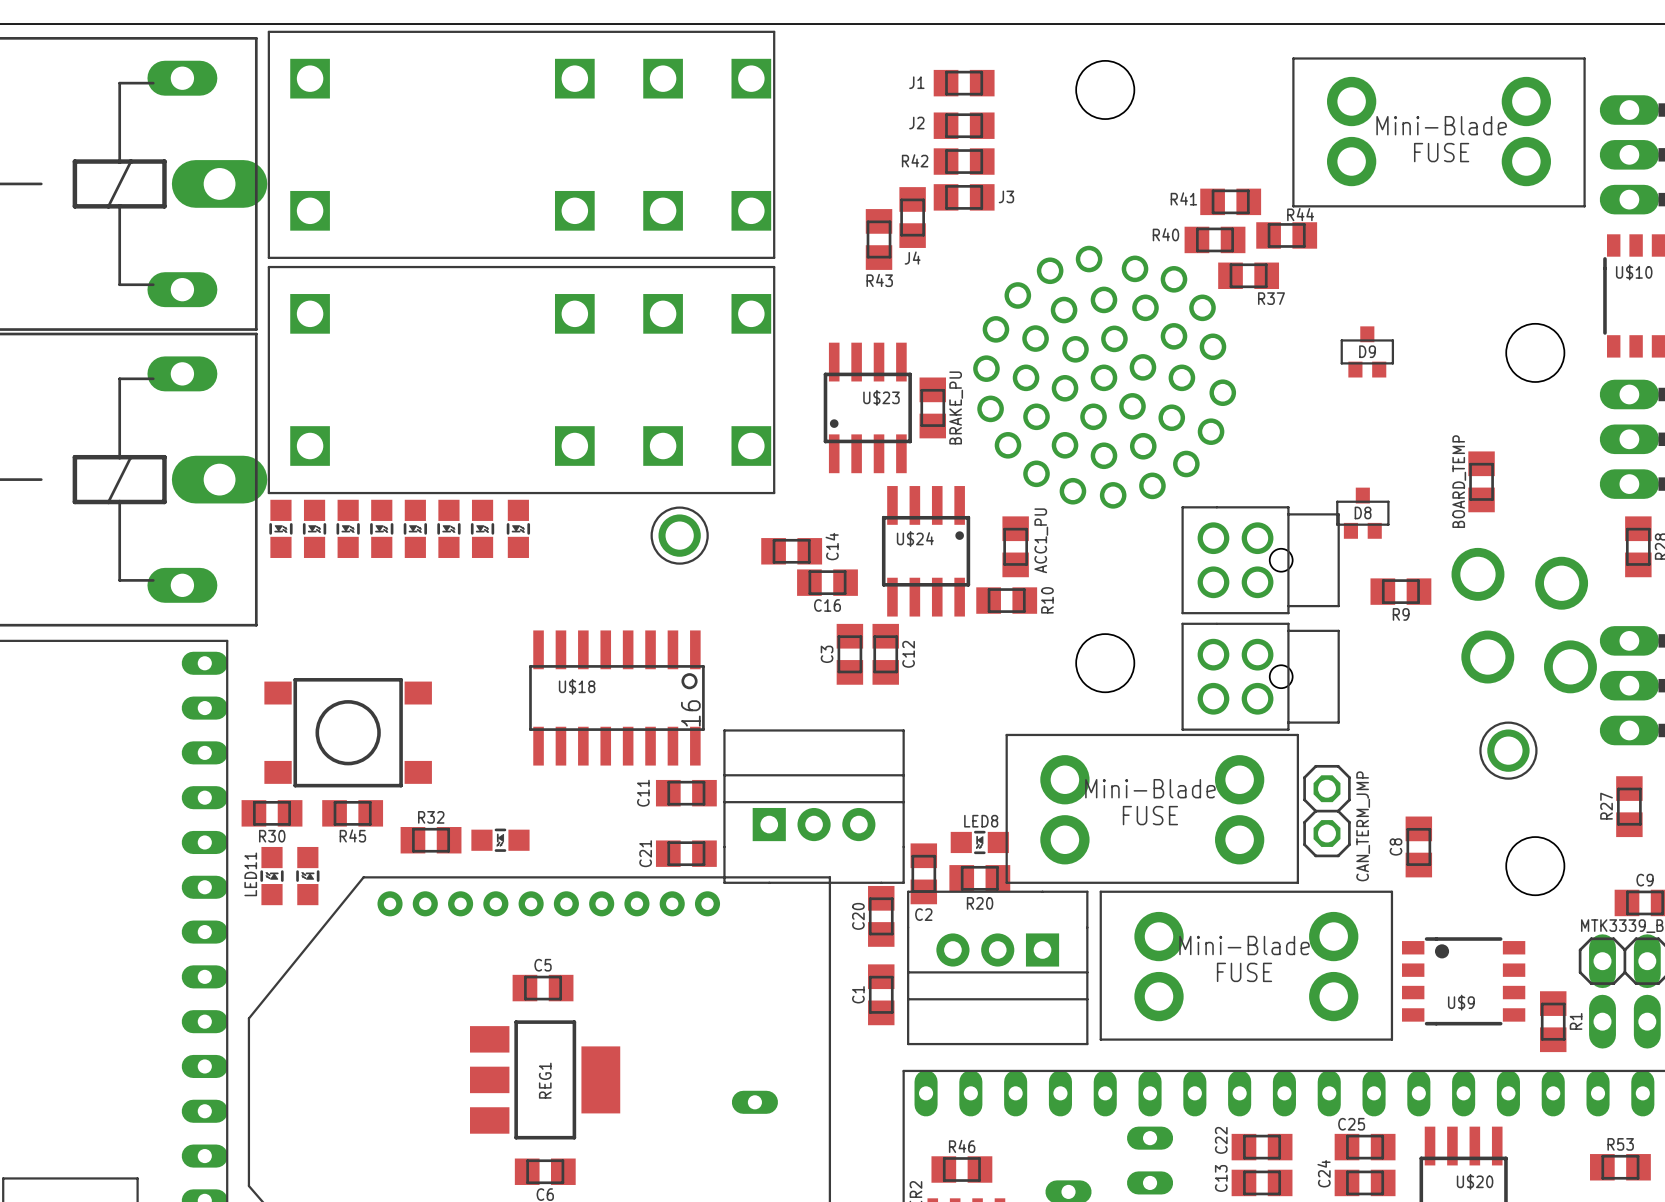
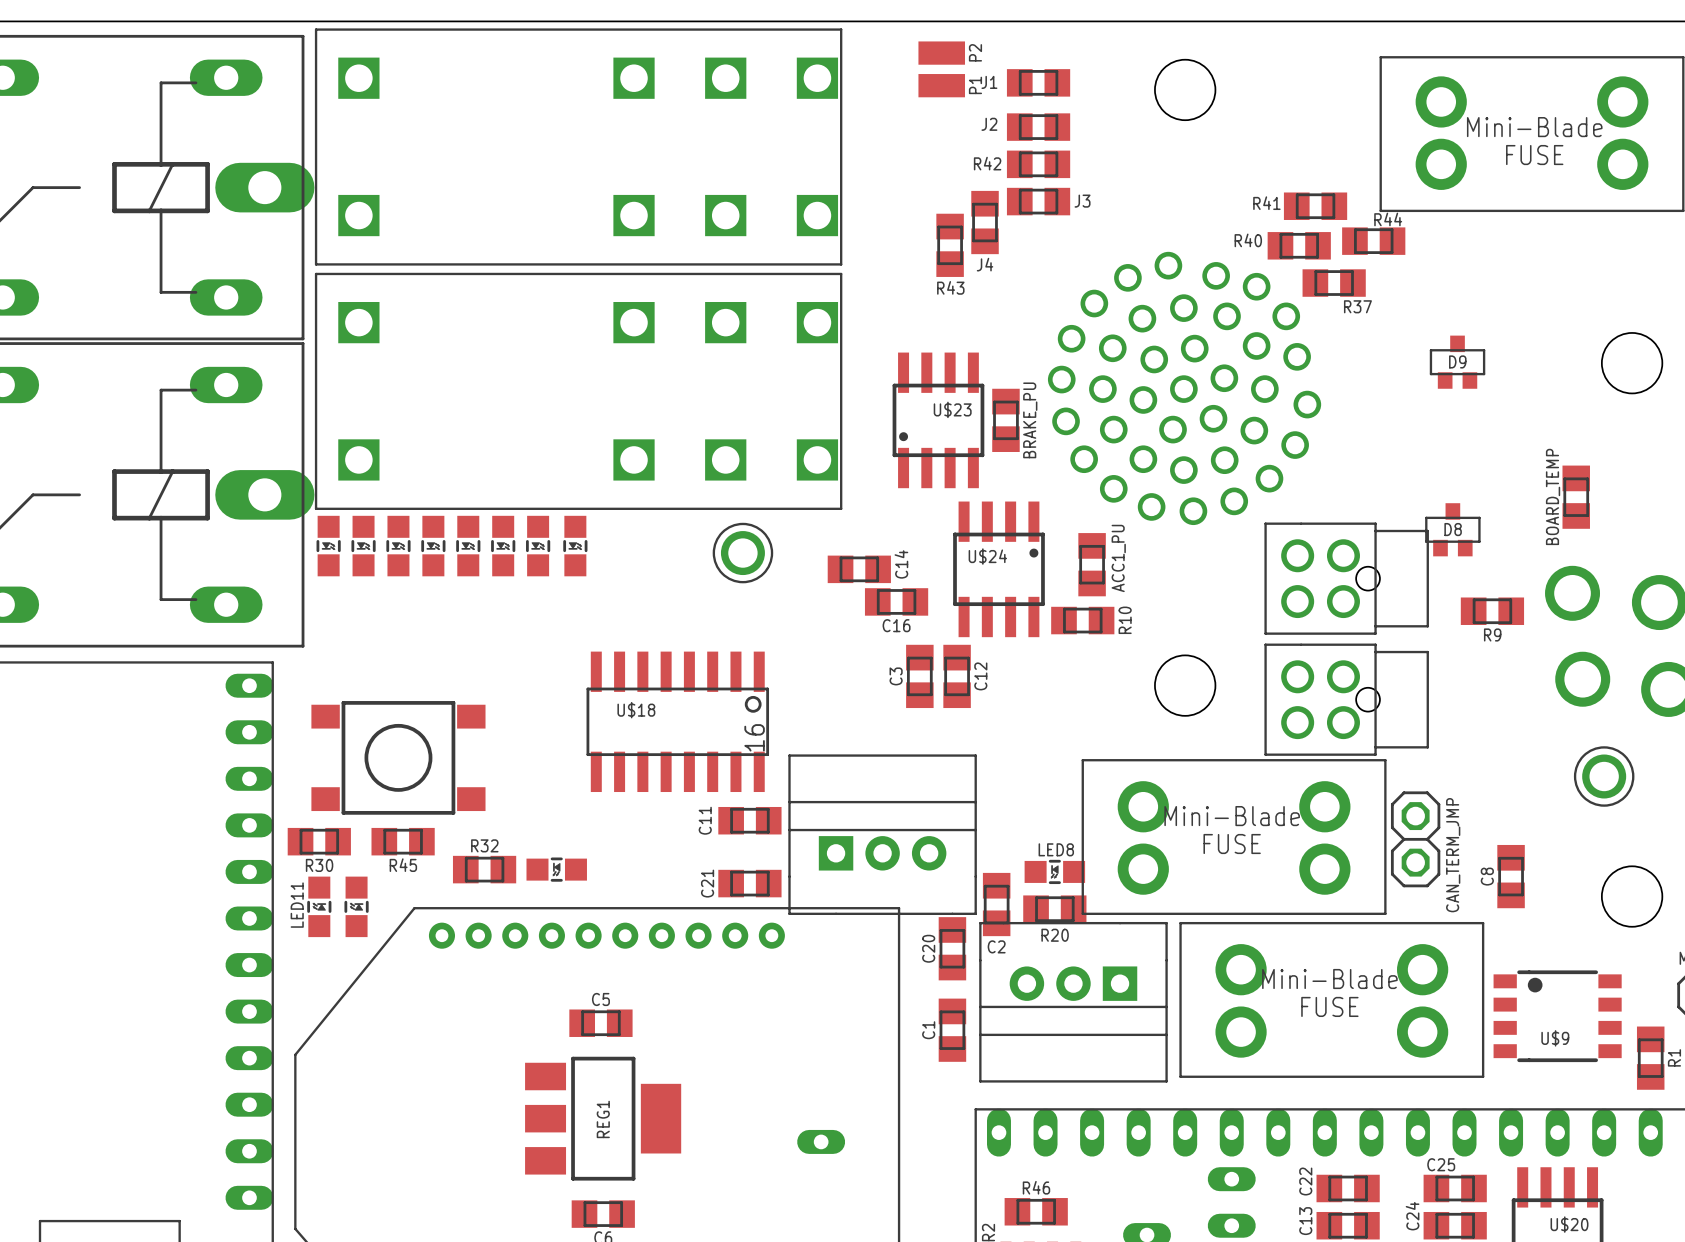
P2: none -> (941, 53)
P1: none -> (941, 85)

